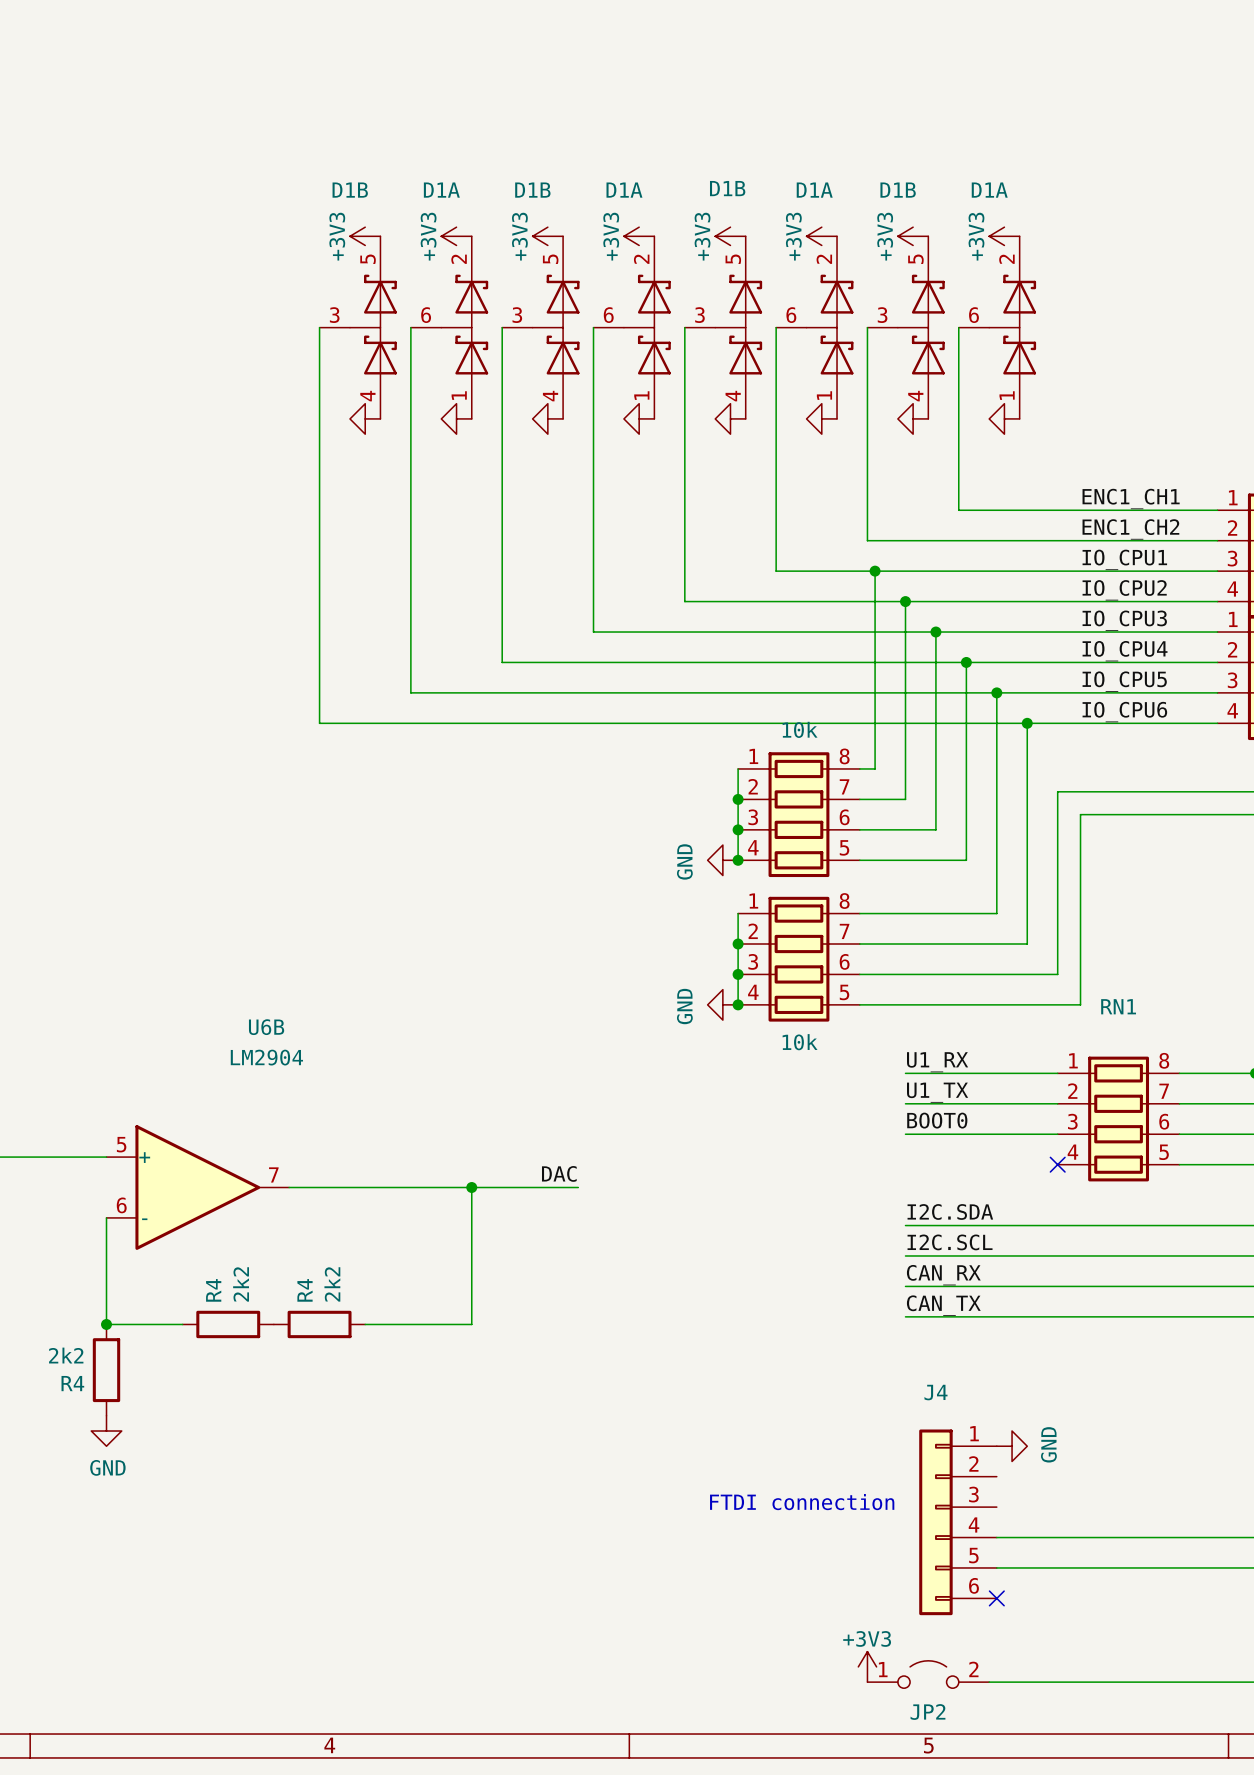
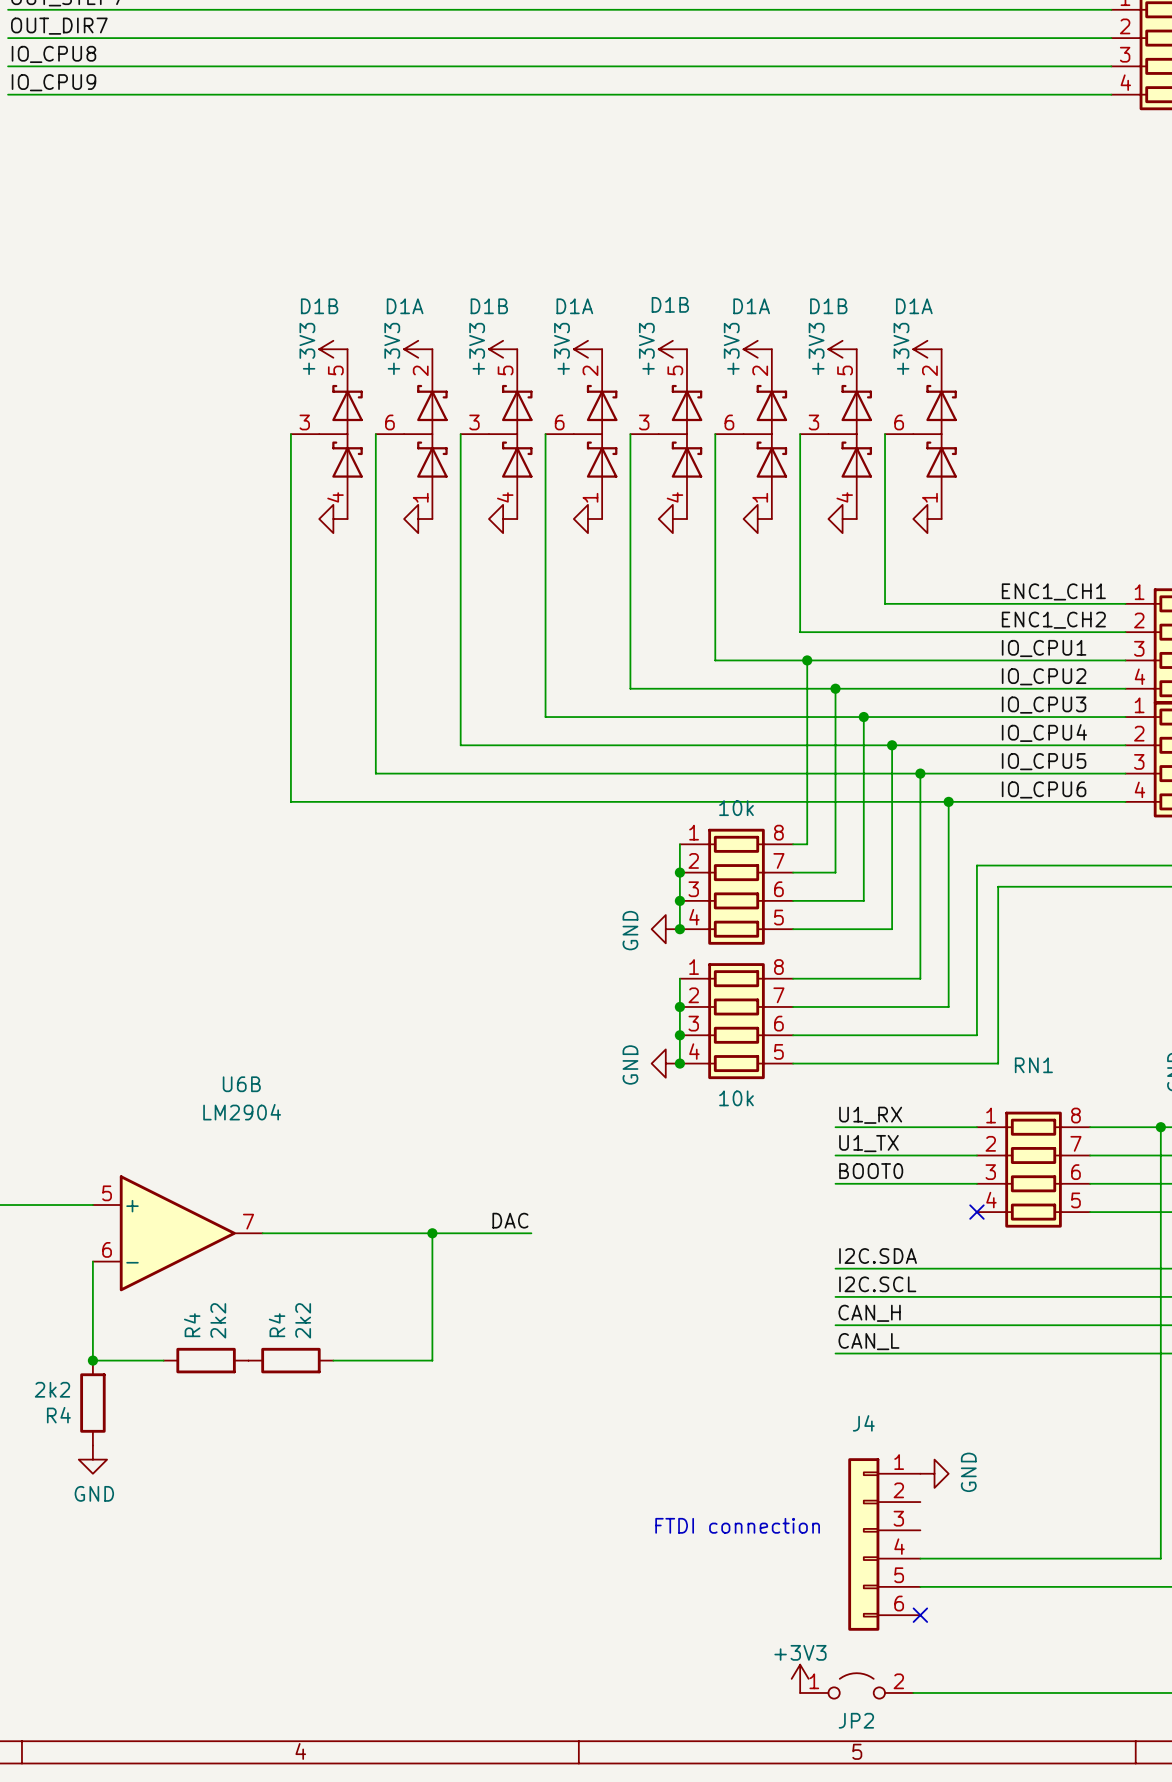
label: CAN_RX (943, 1275) -> CAN_H (869, 1313)
label: CAN_TX (943, 1305) -> CAN_L (868, 1341)

